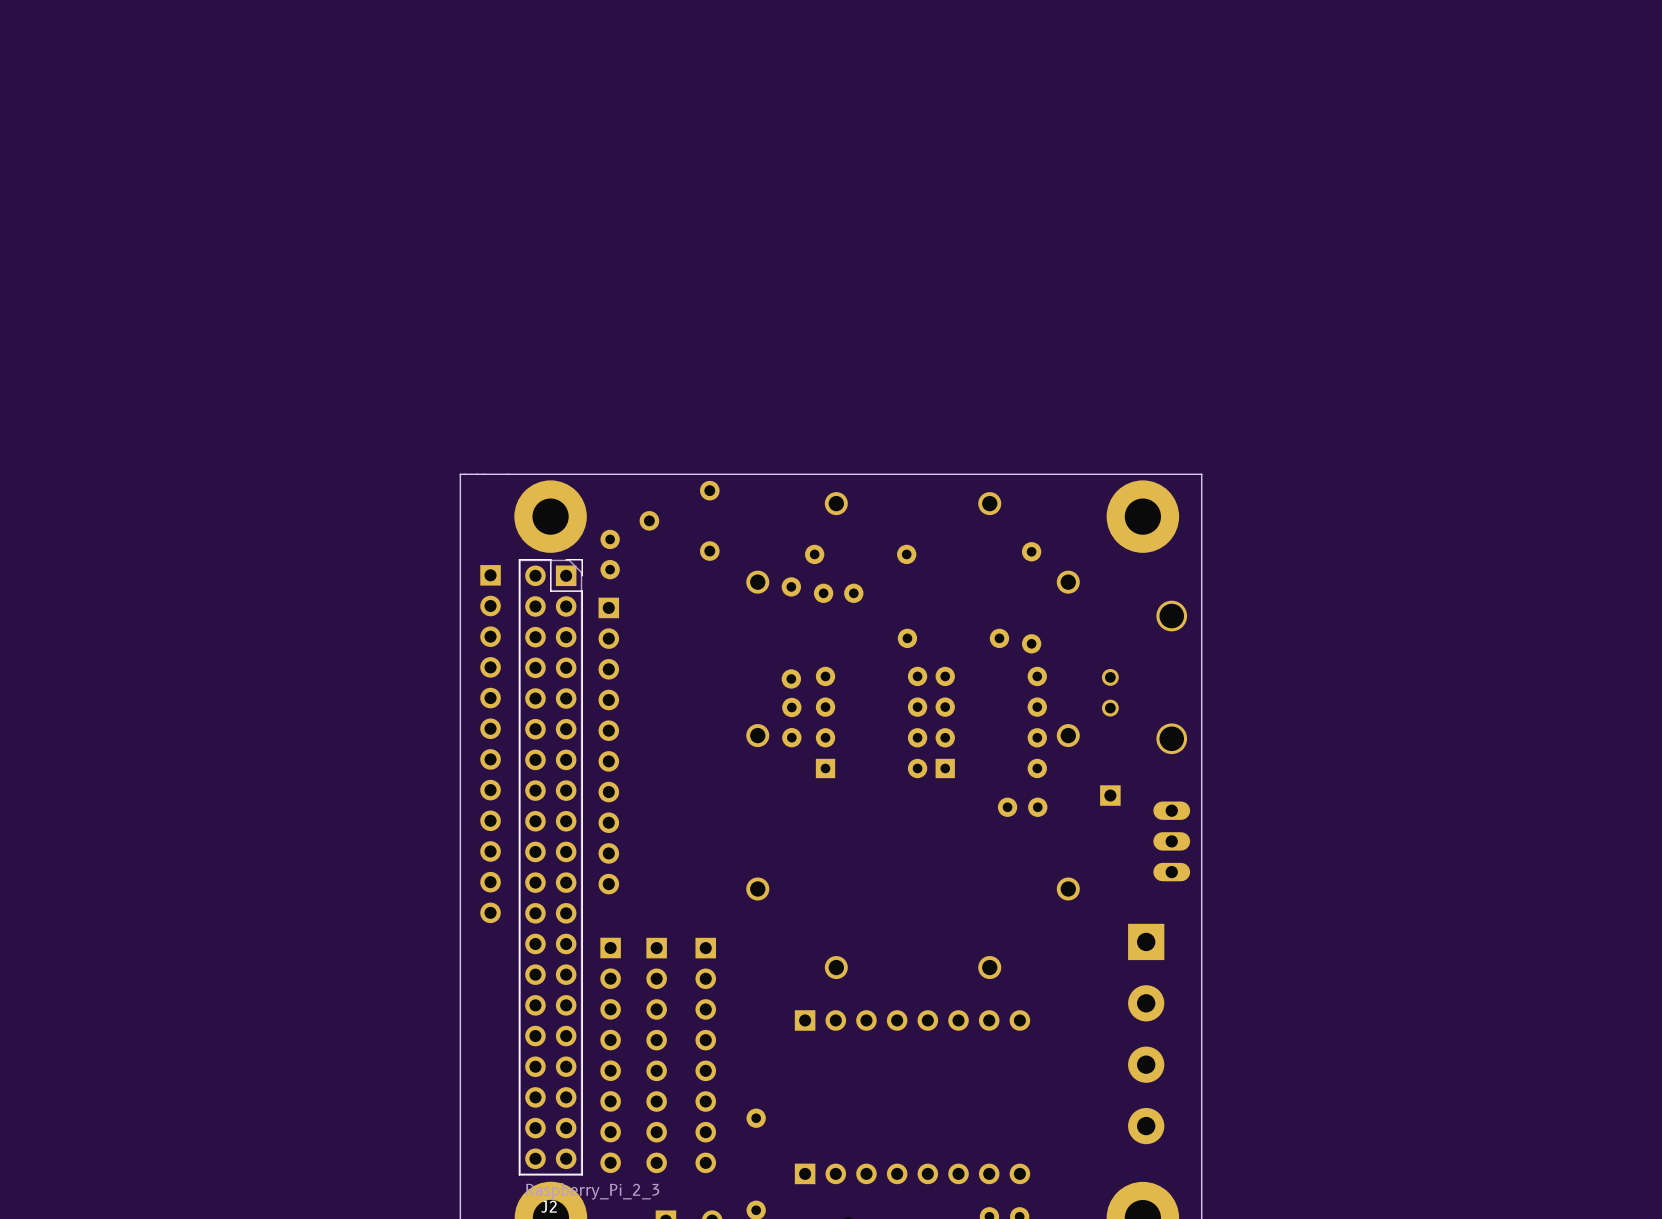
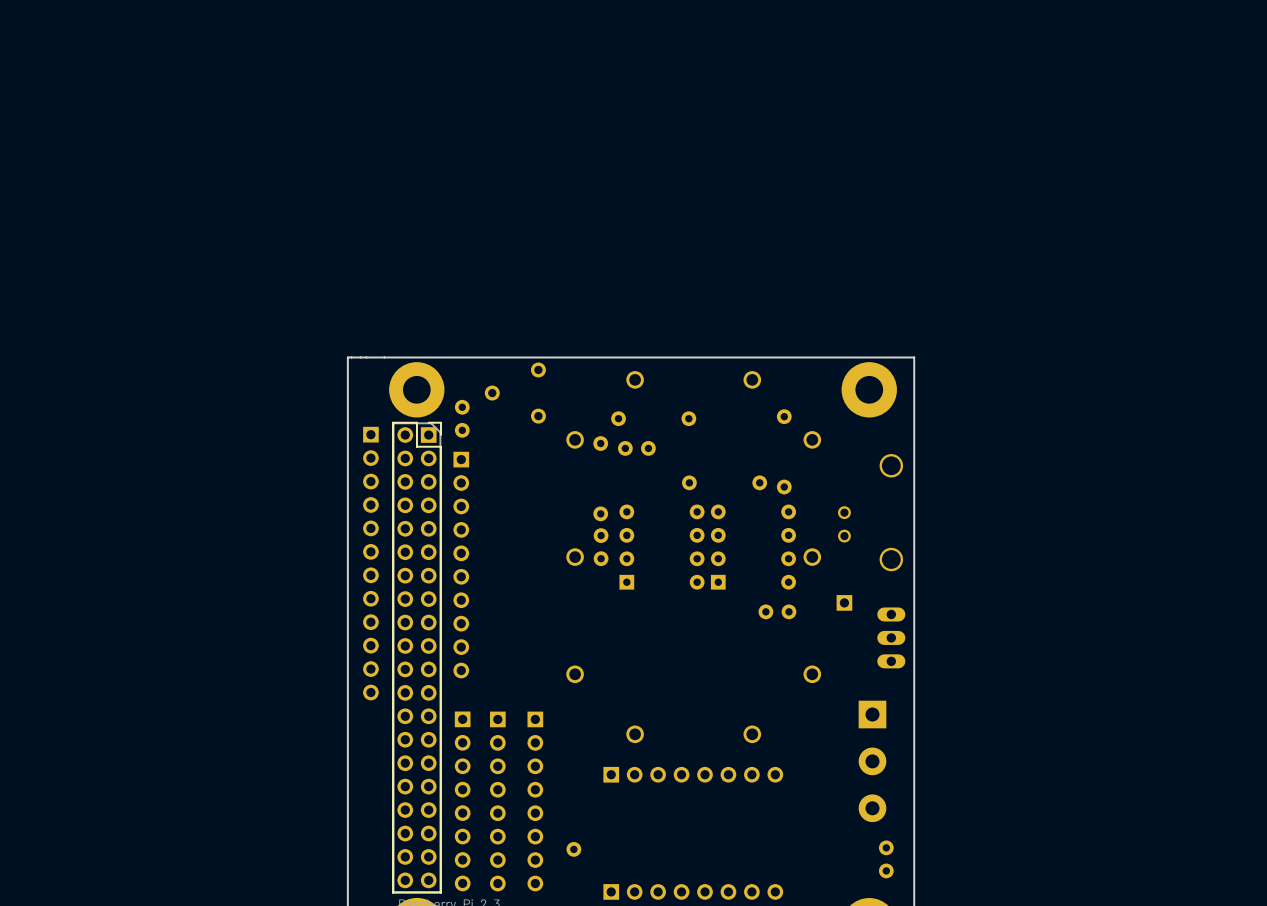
part: none -> (872, 761)
part: (1146, 1034) -> none
part: none -> (886, 859)

